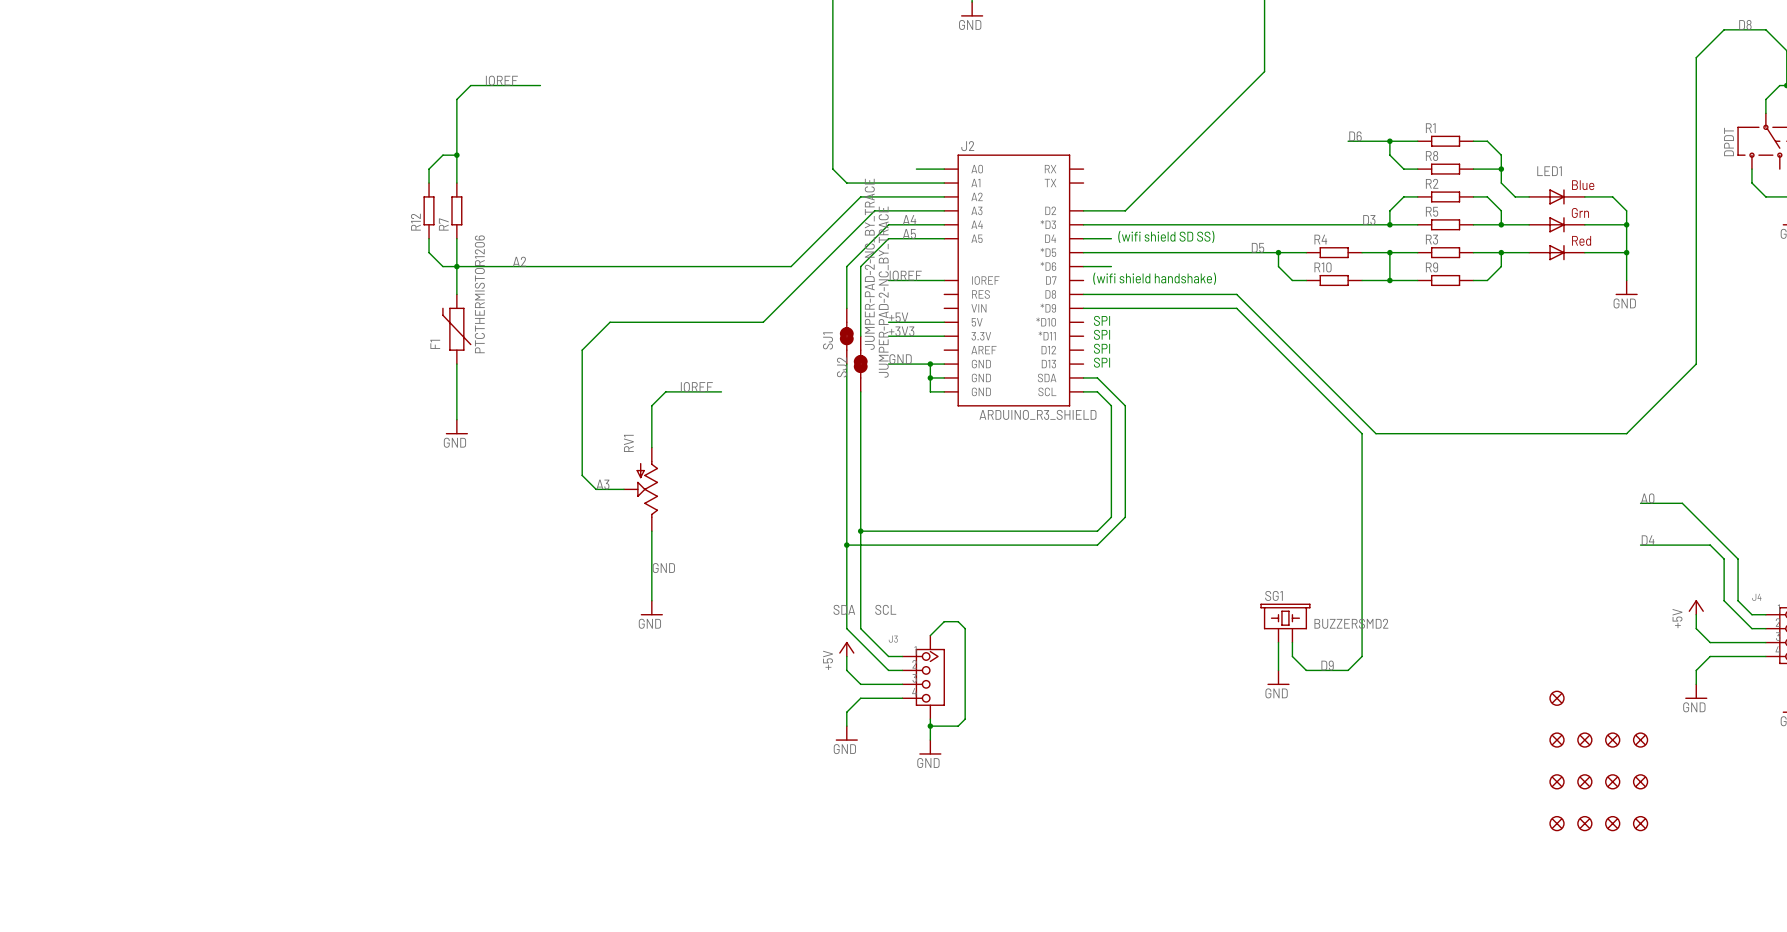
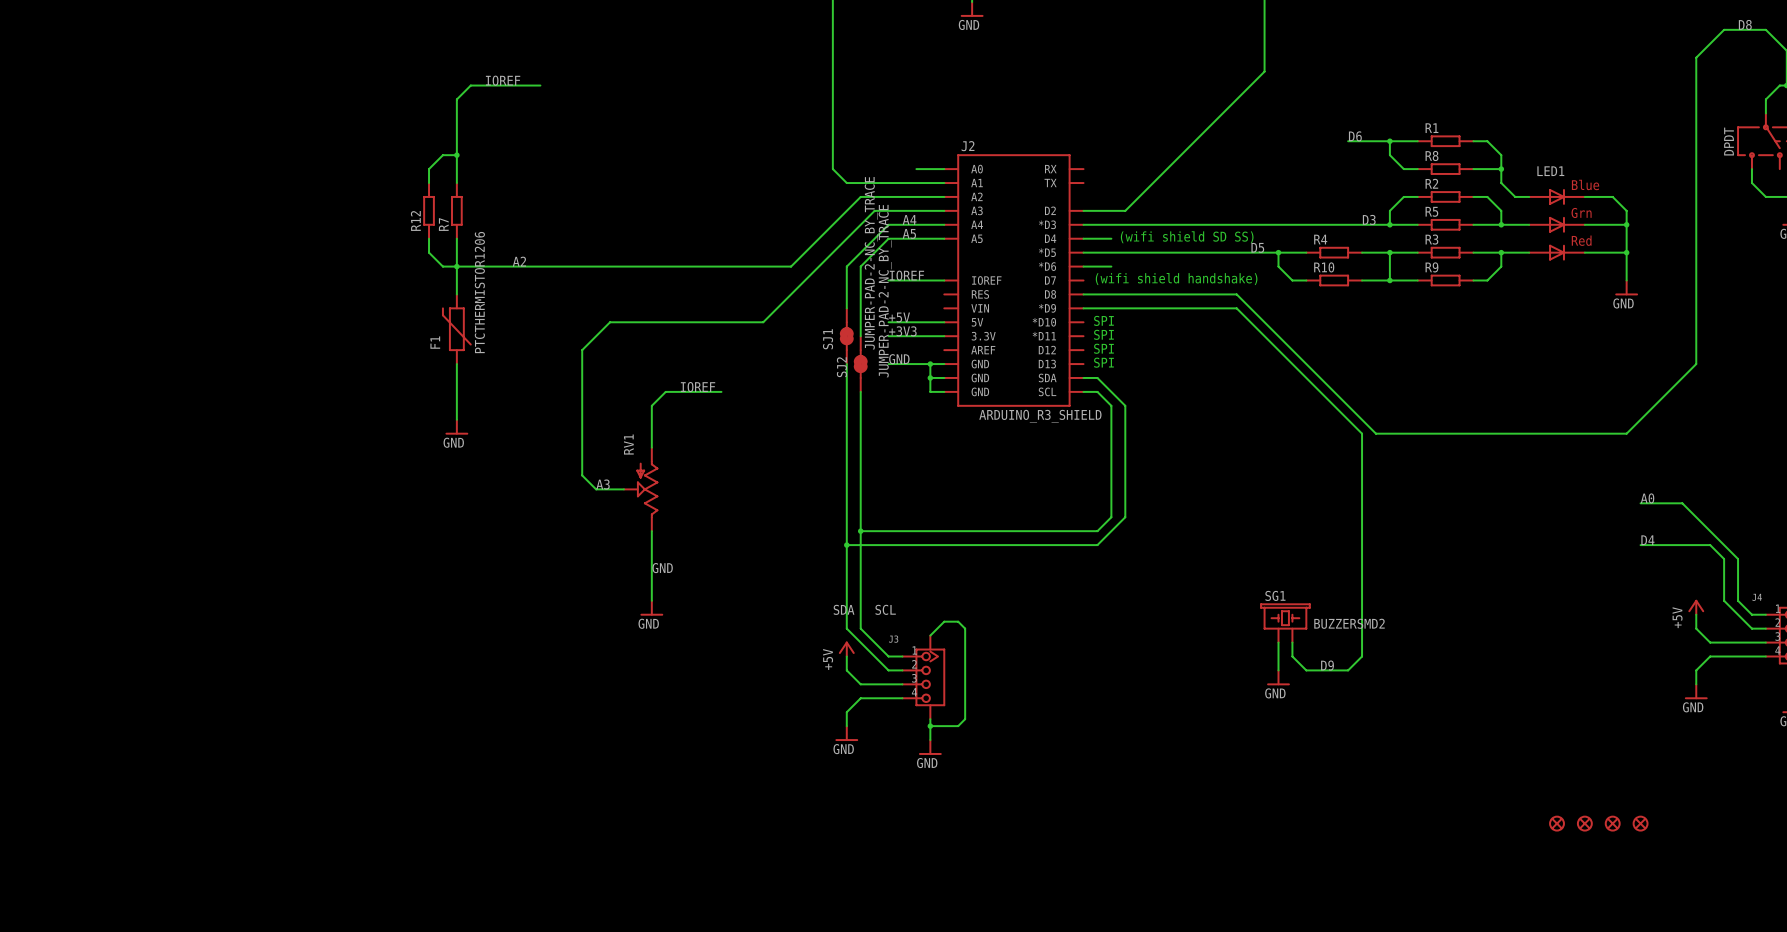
part: (1557, 698) -> none
part: (1557, 740) -> none
part: (1584, 740) -> none
part: (1612, 740) -> none
part: (1640, 740) -> none
part: (1557, 781) -> none
part: (1584, 781) -> none
part: (1612, 781) -> none
part: (1640, 781) -> none

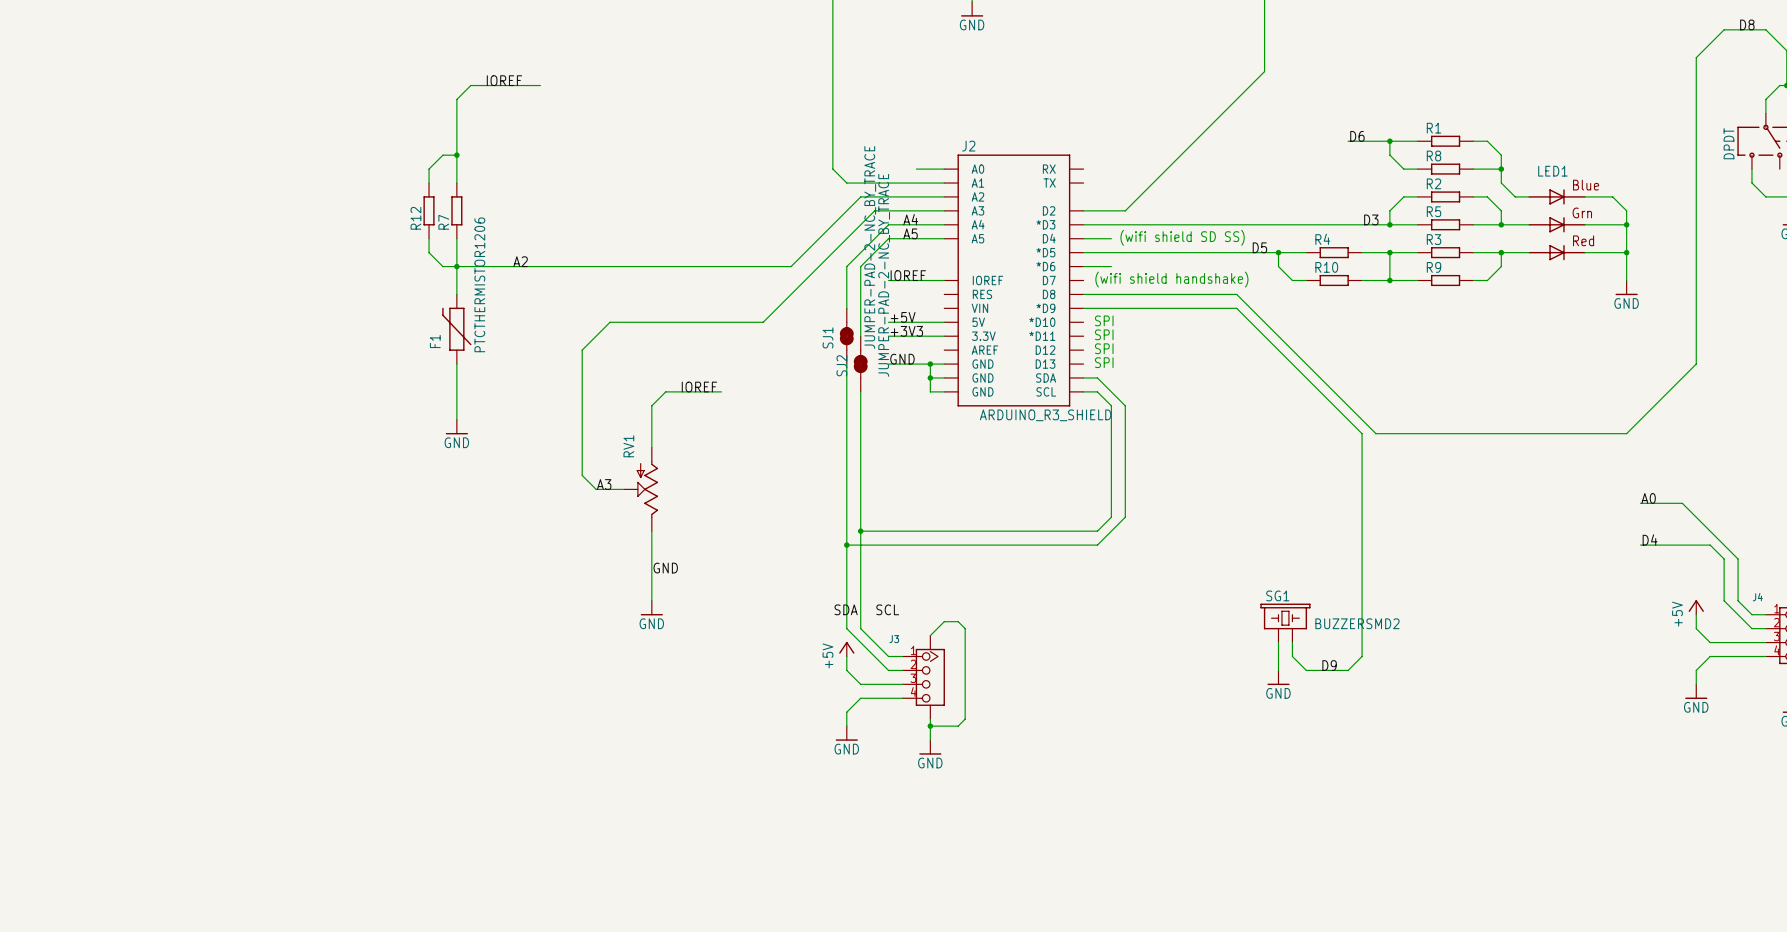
part: (1557, 823) -> none
part: (1584, 823) -> none
part: (1612, 823) -> none
part: (1640, 823) -> none

